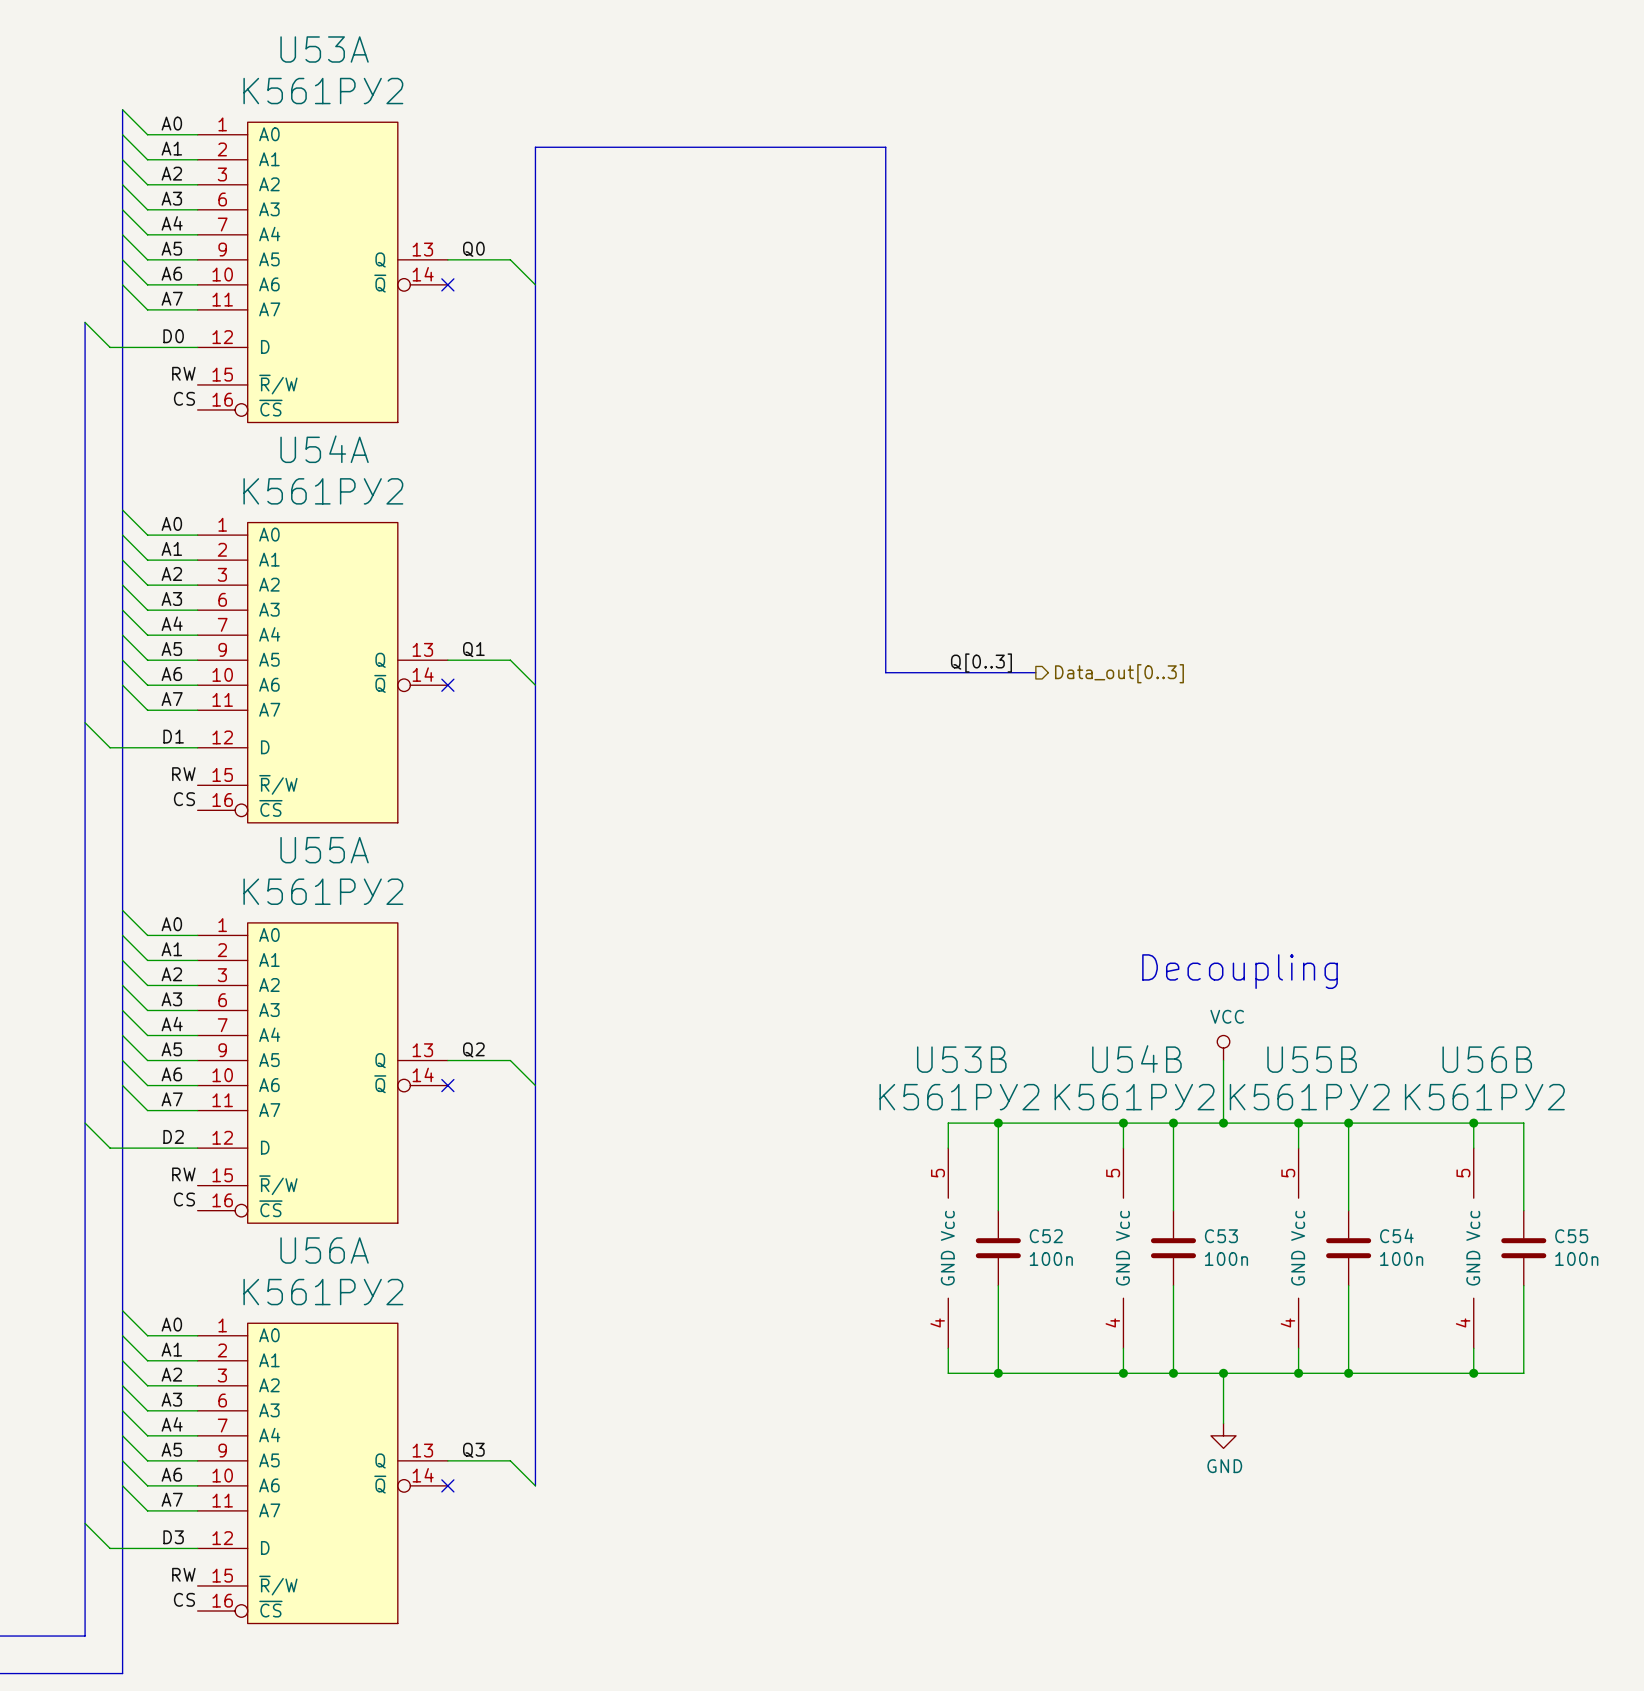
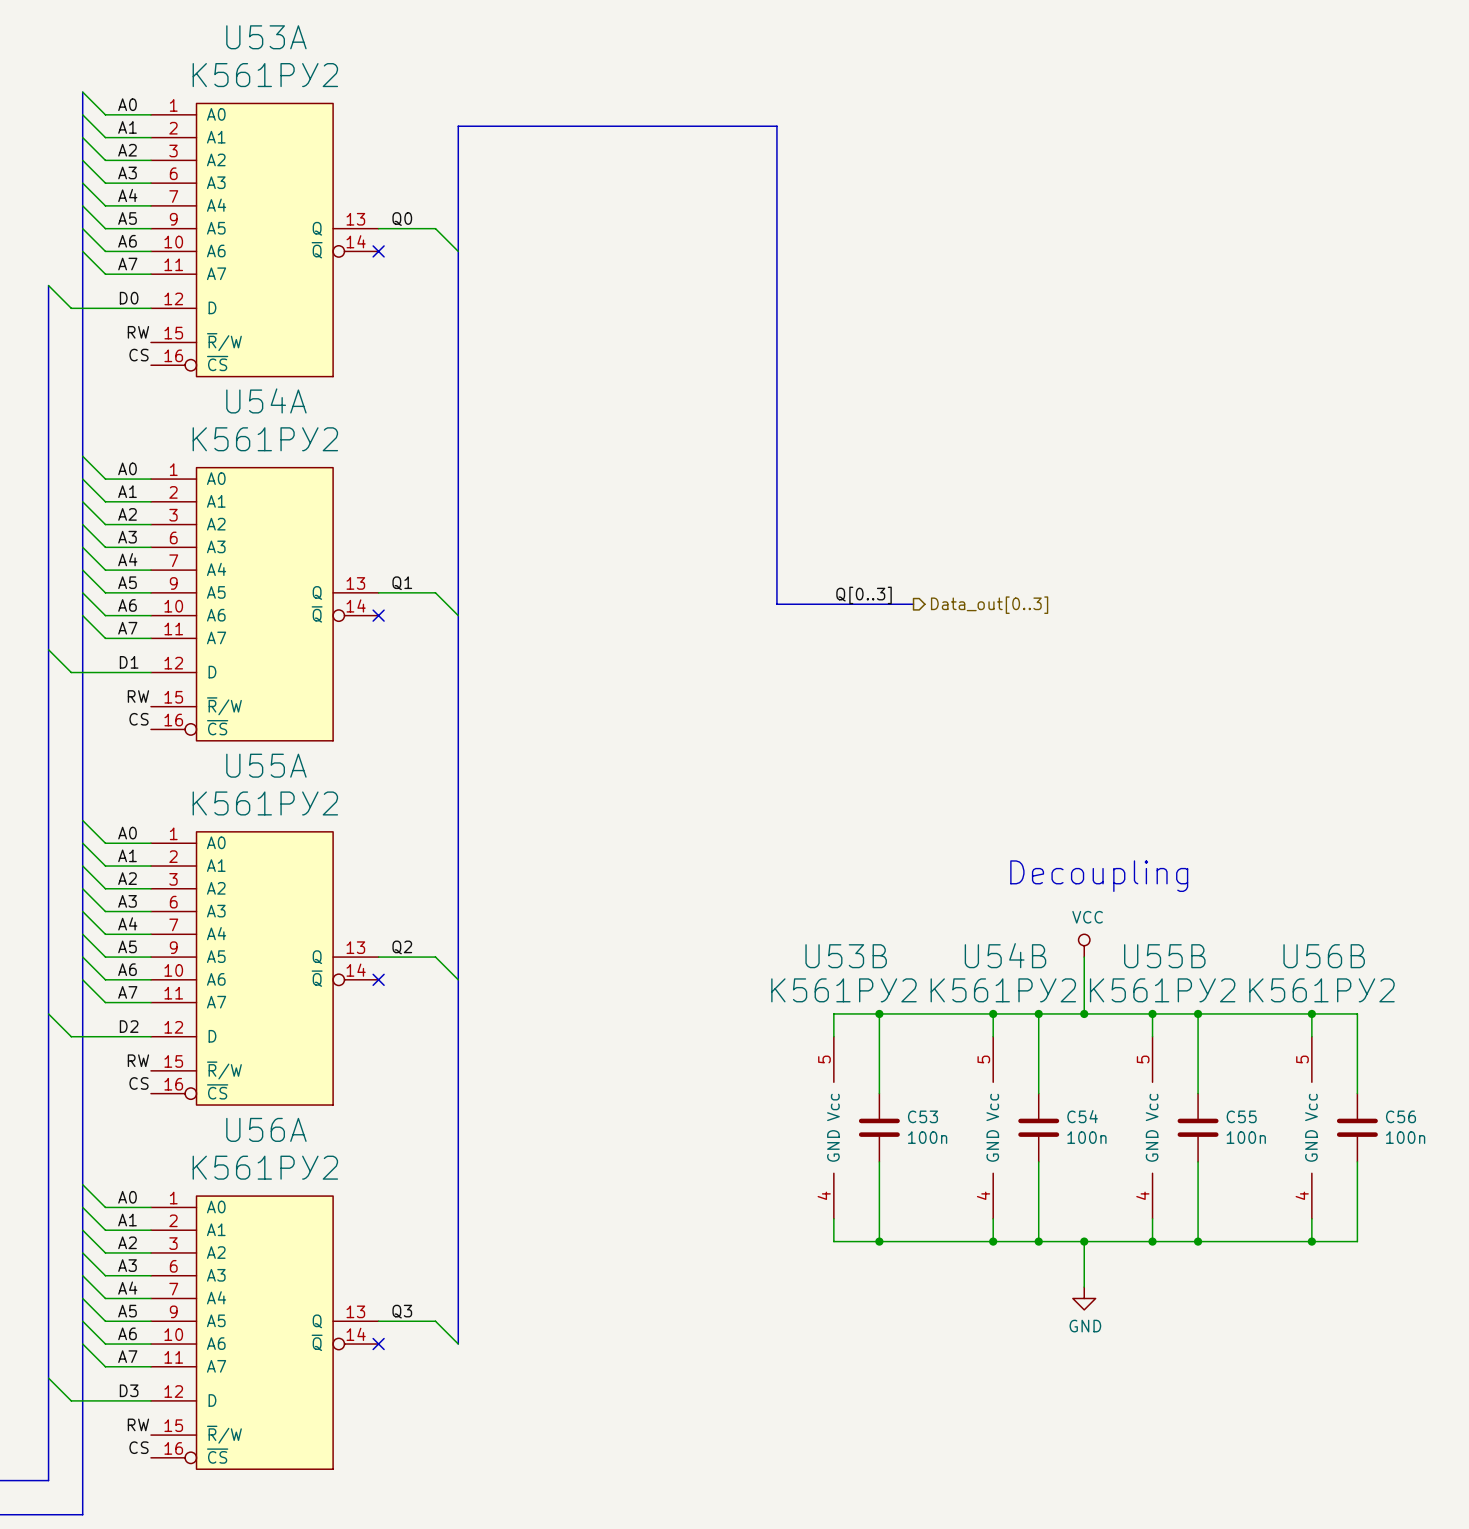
C54 name: C54 (1396, 1235) -> C55 (1241, 1116)
C52 name: C52 (1046, 1236) -> C53 (922, 1116)
C53 name: C53 (1221, 1236) -> C54 (1082, 1116)
C55 name: C55 (1571, 1236) -> C56 (1401, 1116)

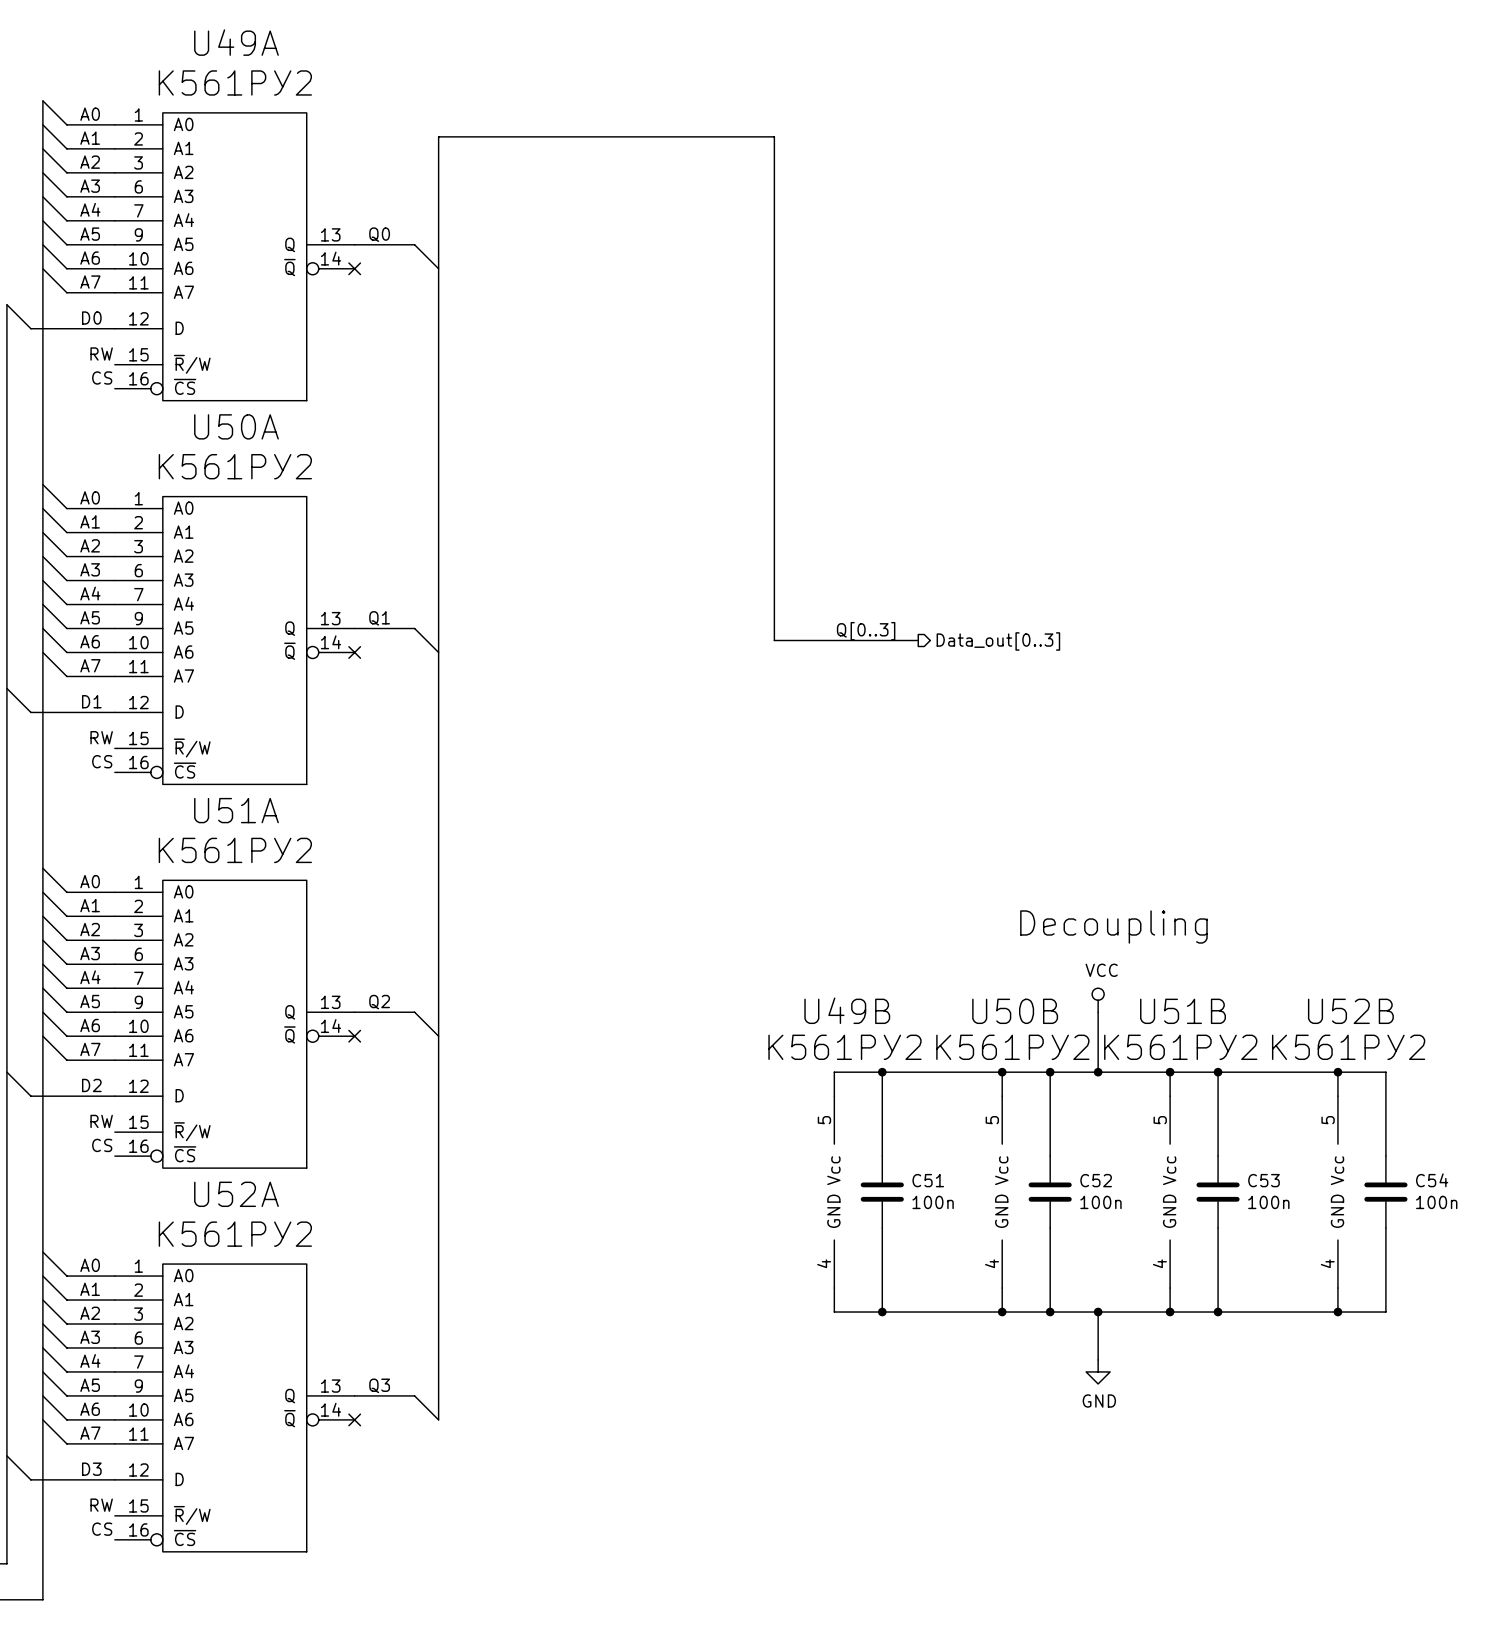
U53A name: U53A (266, 37) -> U49A (236, 42)
U54A name: U54A (266, 400) -> U50A (236, 426)
U55A name: U55A (266, 765) -> U51A (236, 810)
U54B name: U54B (1005, 955) -> U50B (1015, 1011)
U53B name: U53B (846, 956) -> U49B (847, 1010)
U55B name: U55B (1164, 956) -> U51B (1183, 1011)
U56B name: U56B (1324, 956) -> U52B (1350, 1011)
C53 name: C53 (922, 1116) -> C51 (928, 1180)
C54 name: C54 (1082, 1116) -> C52 (1096, 1180)
C55 name: C55 (1241, 1116) -> C53 (1263, 1180)
C56 name: C56 (1401, 1116) -> C54 (1432, 1180)
U56A name: U56A (266, 1129) -> U52A (236, 1194)

